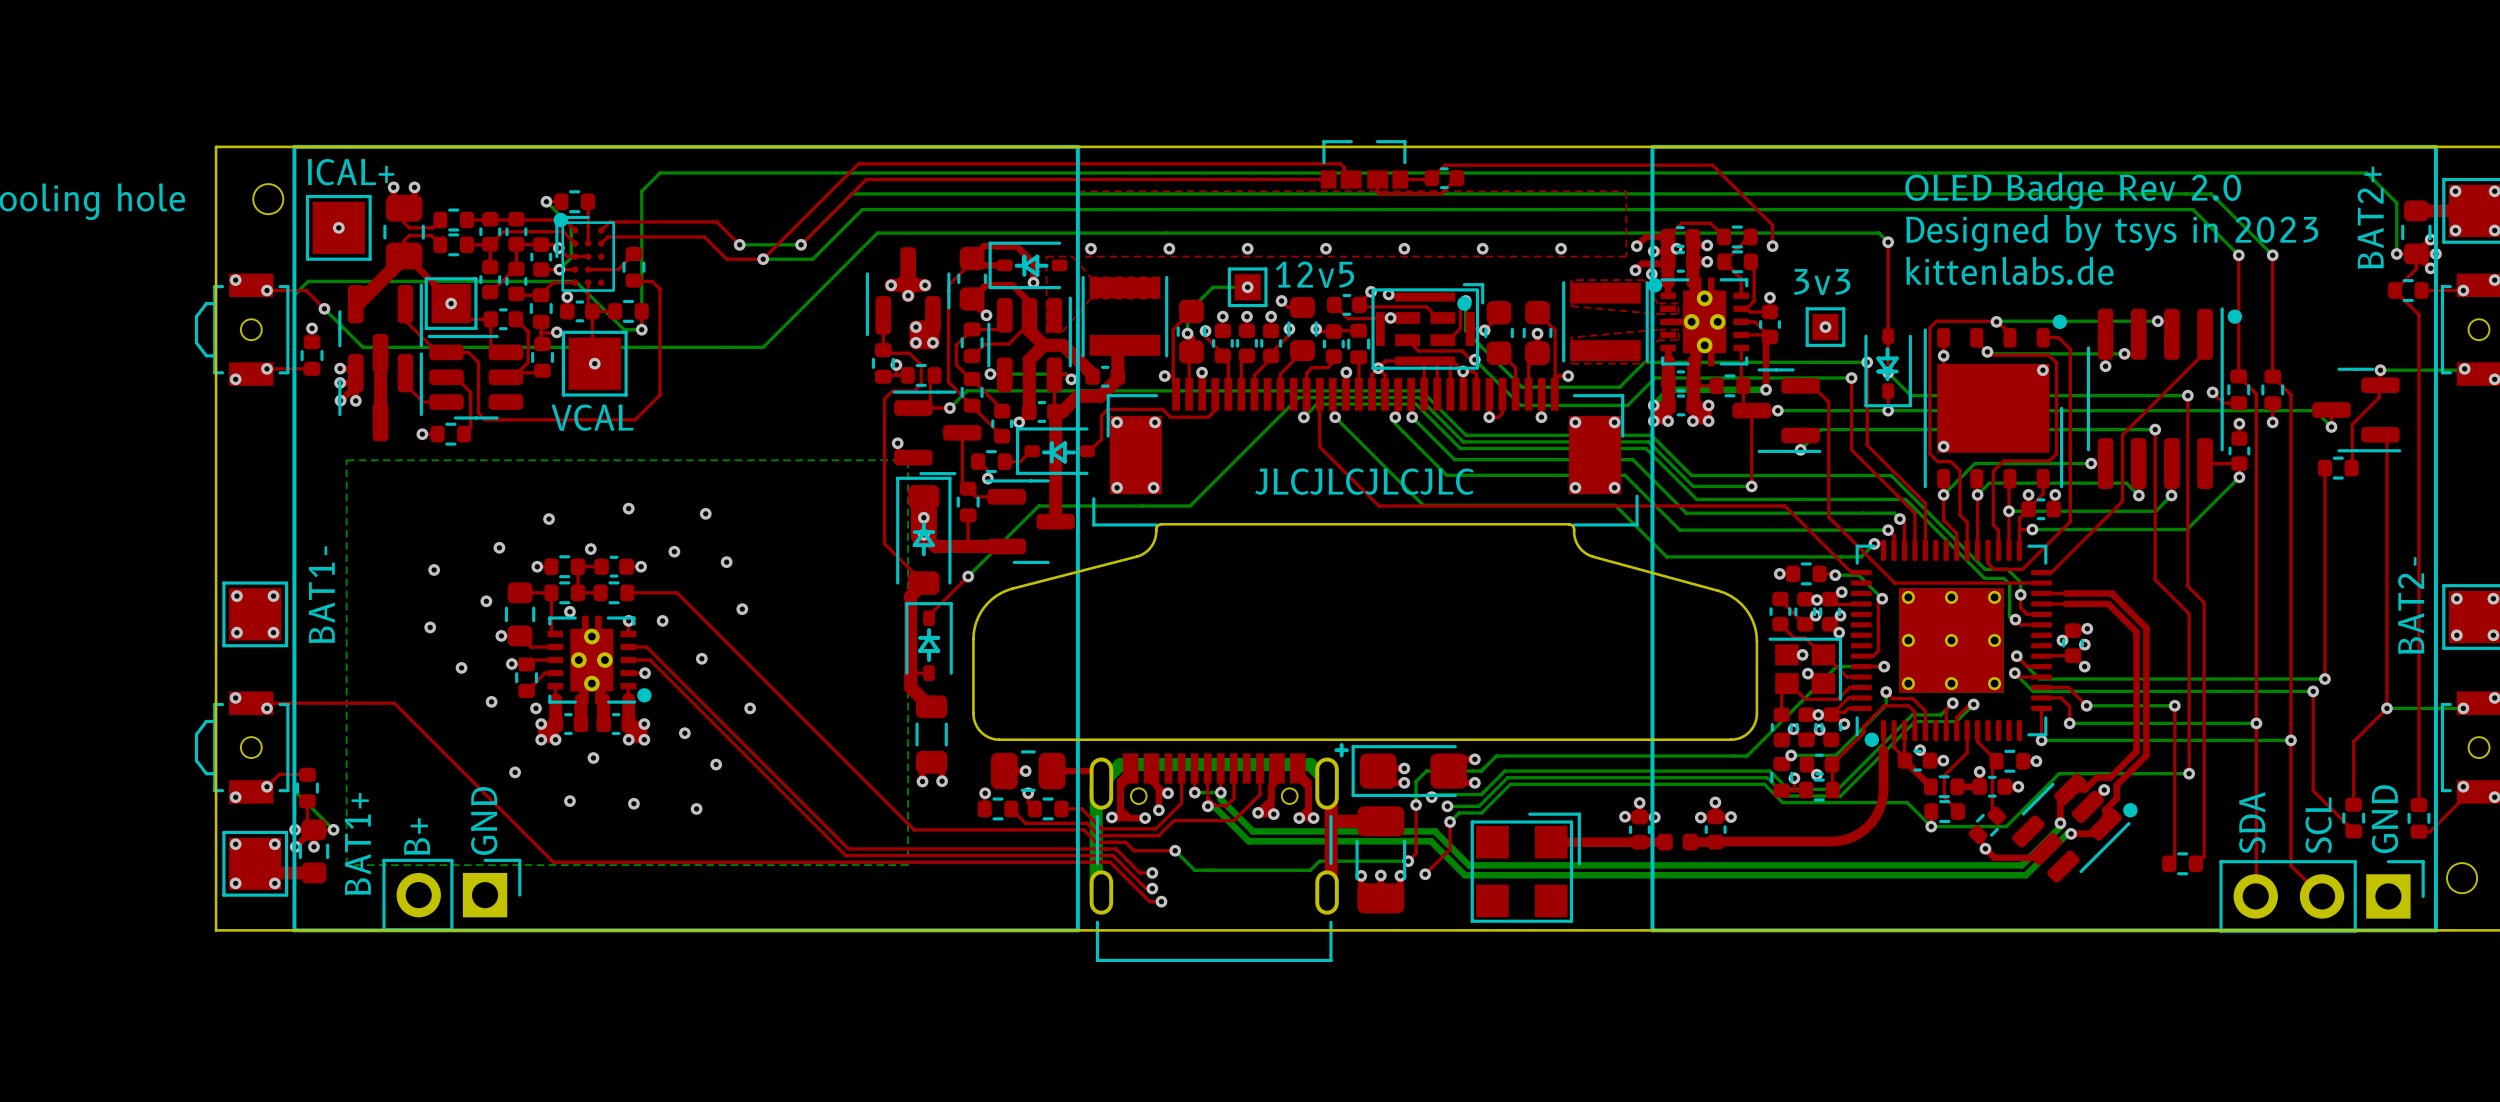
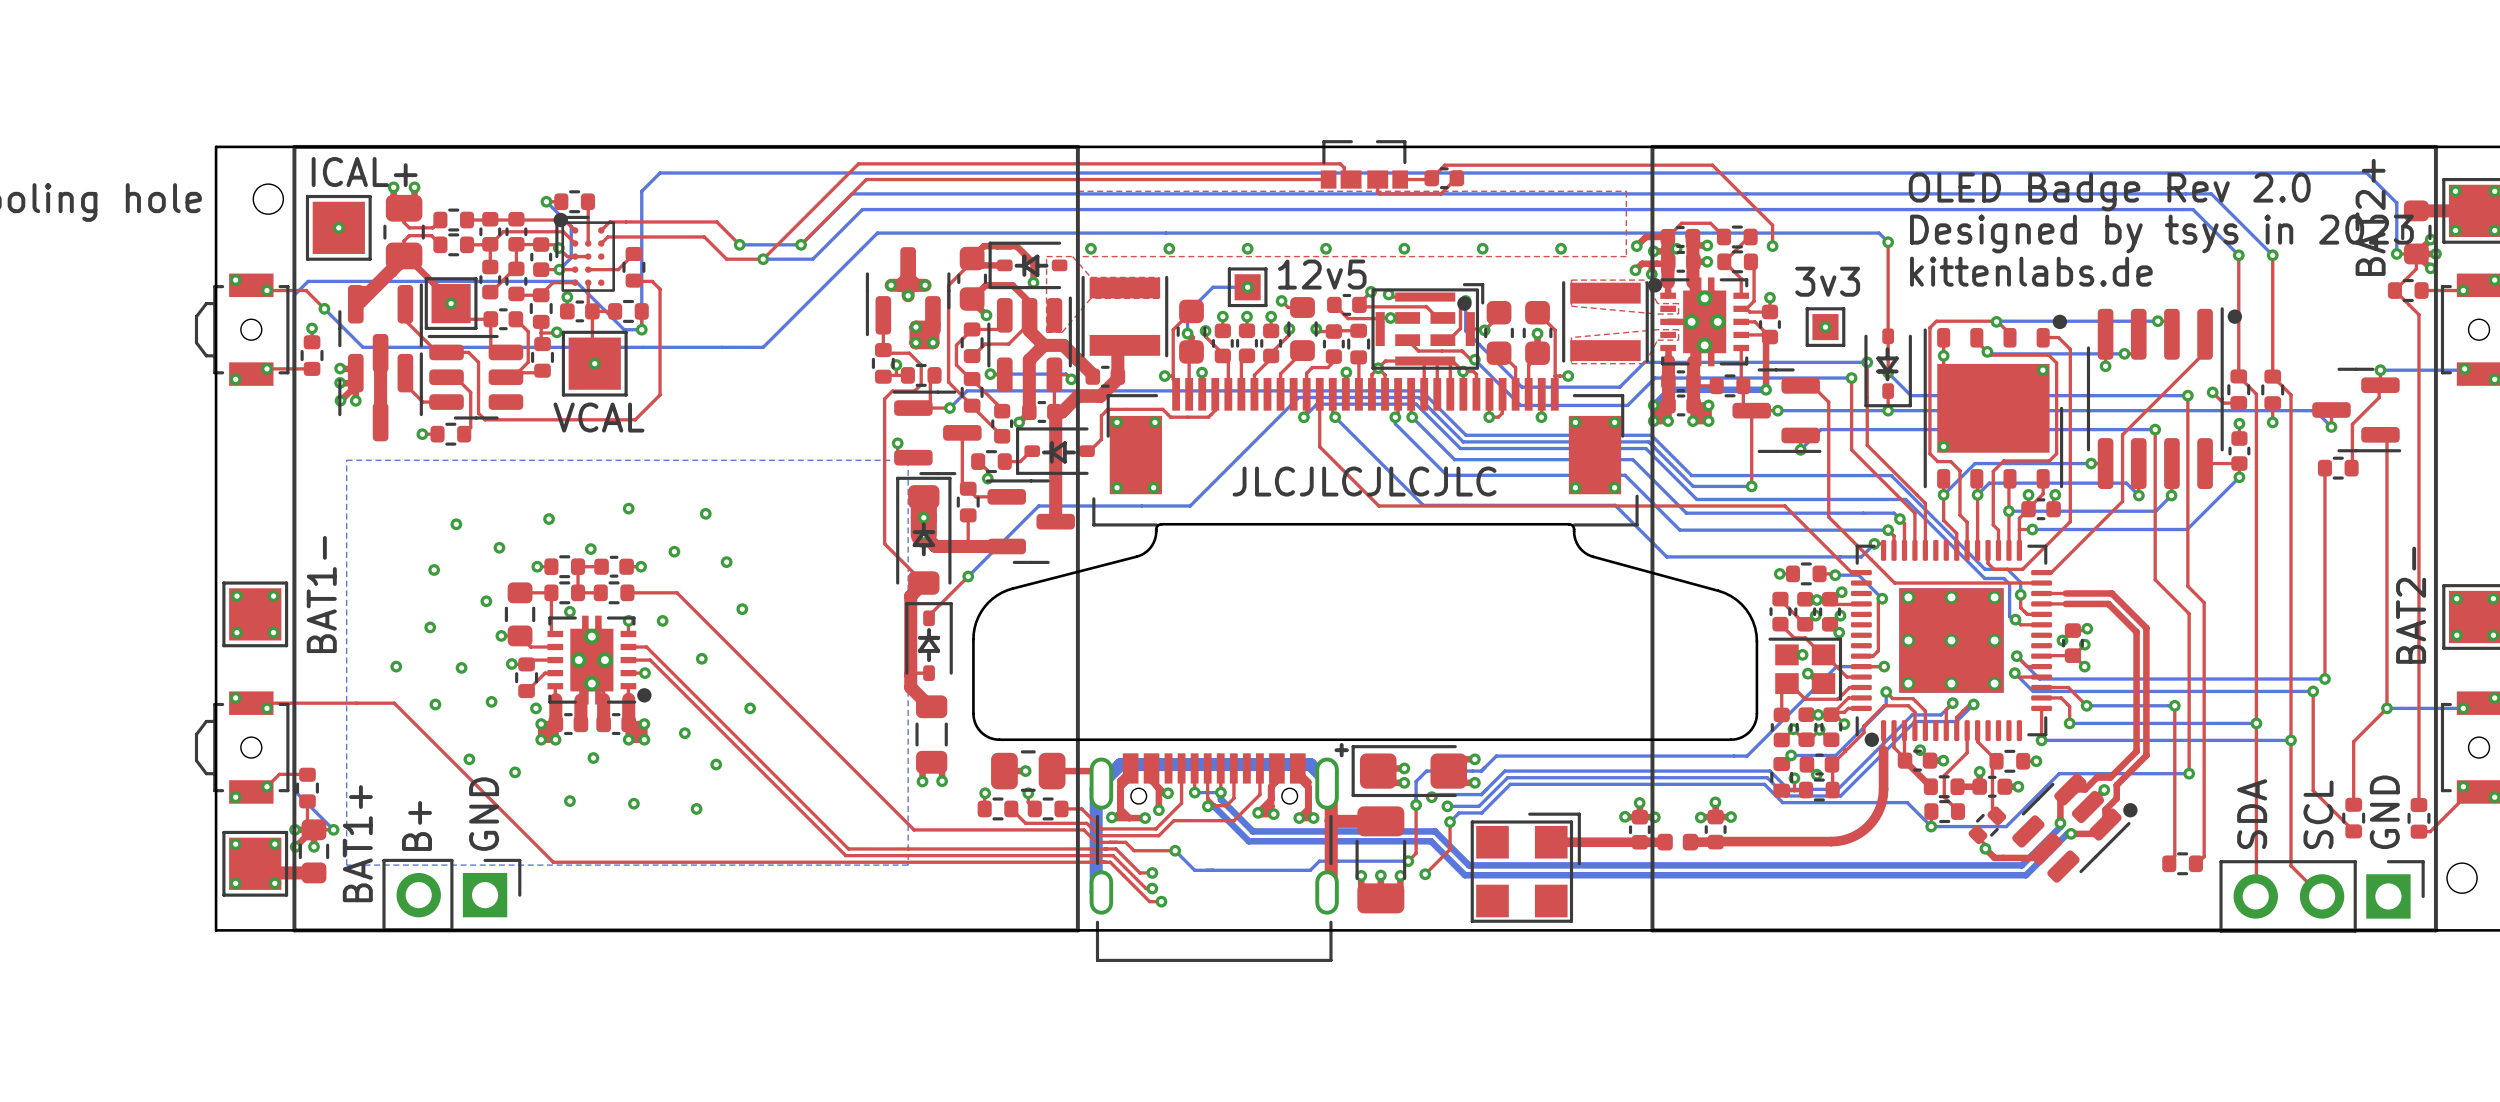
via: none -> (456, 524)
via: none -> (396, 666)
via: none -> (435, 704)
via: none -> (469, 759)

